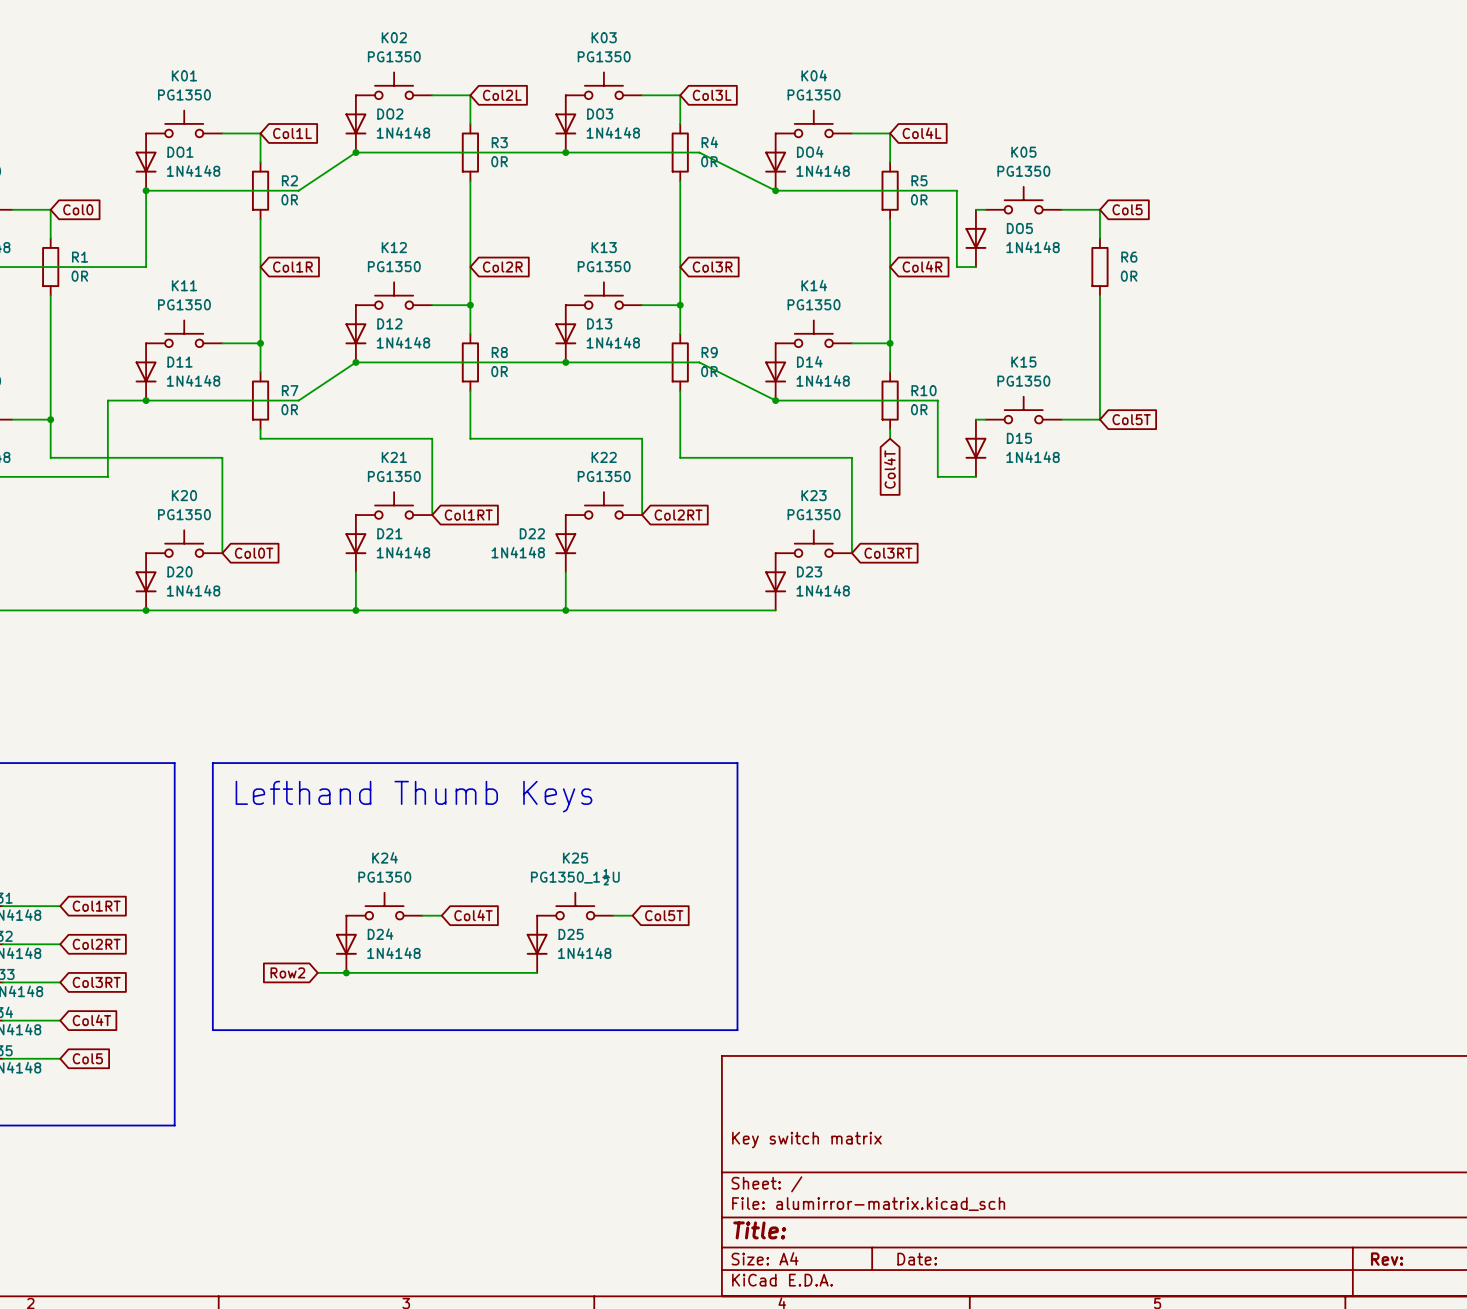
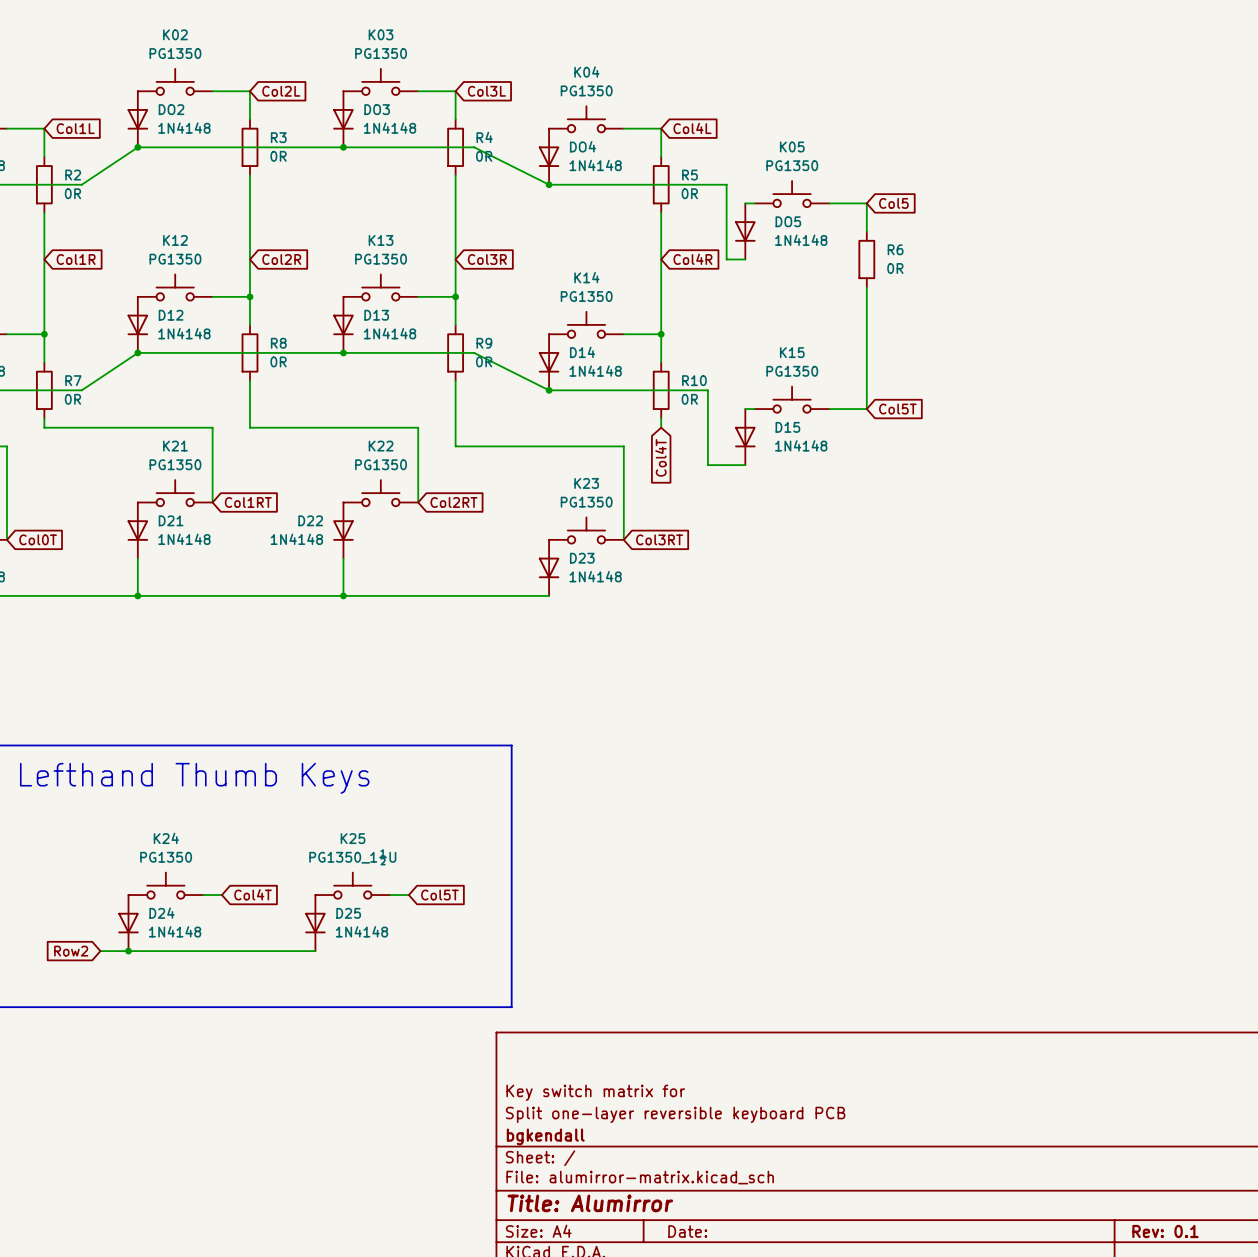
title block: none -> Key switch matrix for (595, 1092)
title block: Key switch matrix (806, 1140) -> Split one-layer reversible keyboard PCB (675, 1114)
title block: none -> bgkendall (545, 1136)
title block: Title: (759, 1230) -> Title: Alumirror (590, 1203)
title block: Rev: (1387, 1259) -> Rev: 0.1 (1165, 1231)

